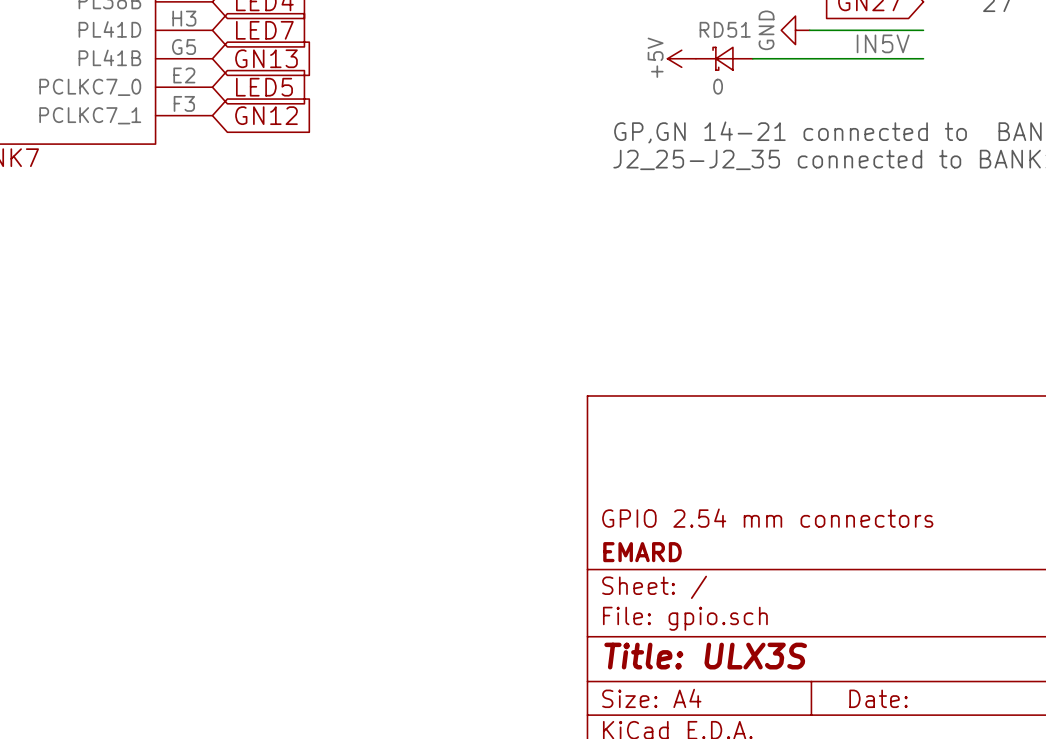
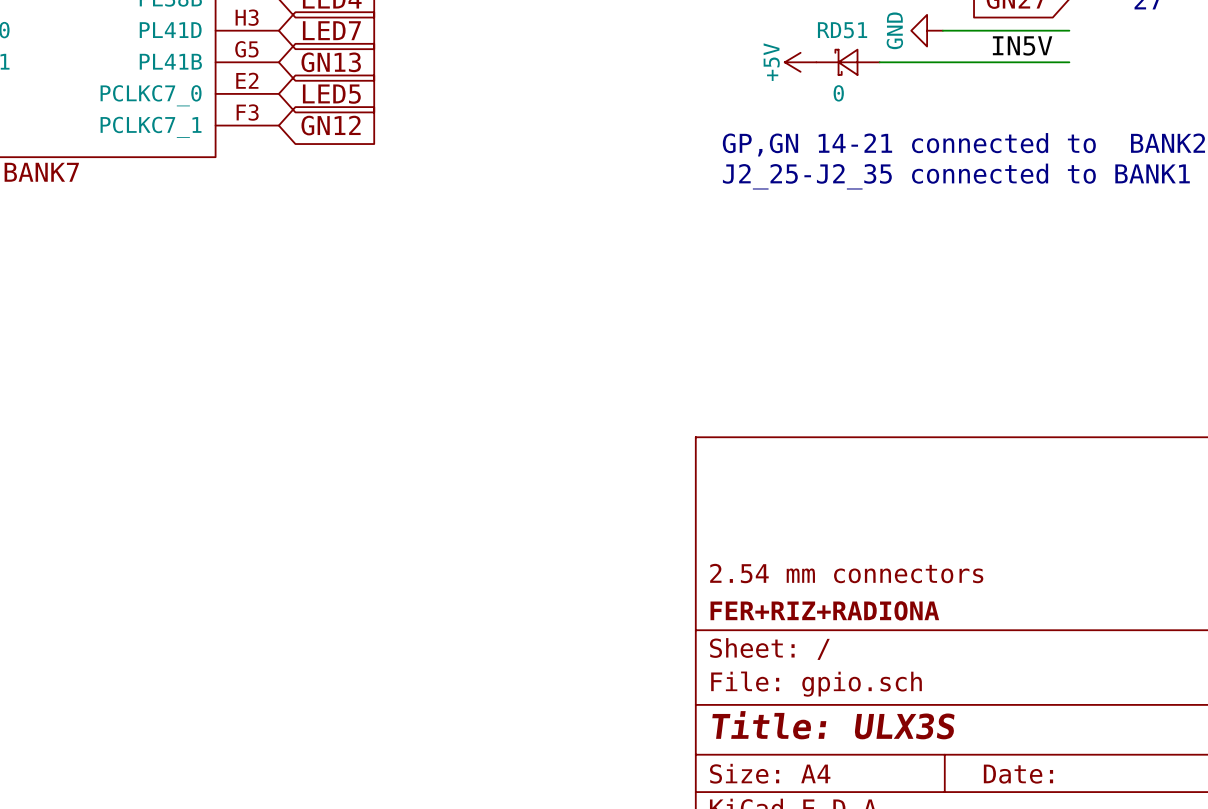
title block: GPIO 2.54 mm connectors (767, 518) -> 2.54 mm connectors (846, 573)
title block: EMARD (642, 552) -> FER+RIZ+RADIONA (824, 610)

